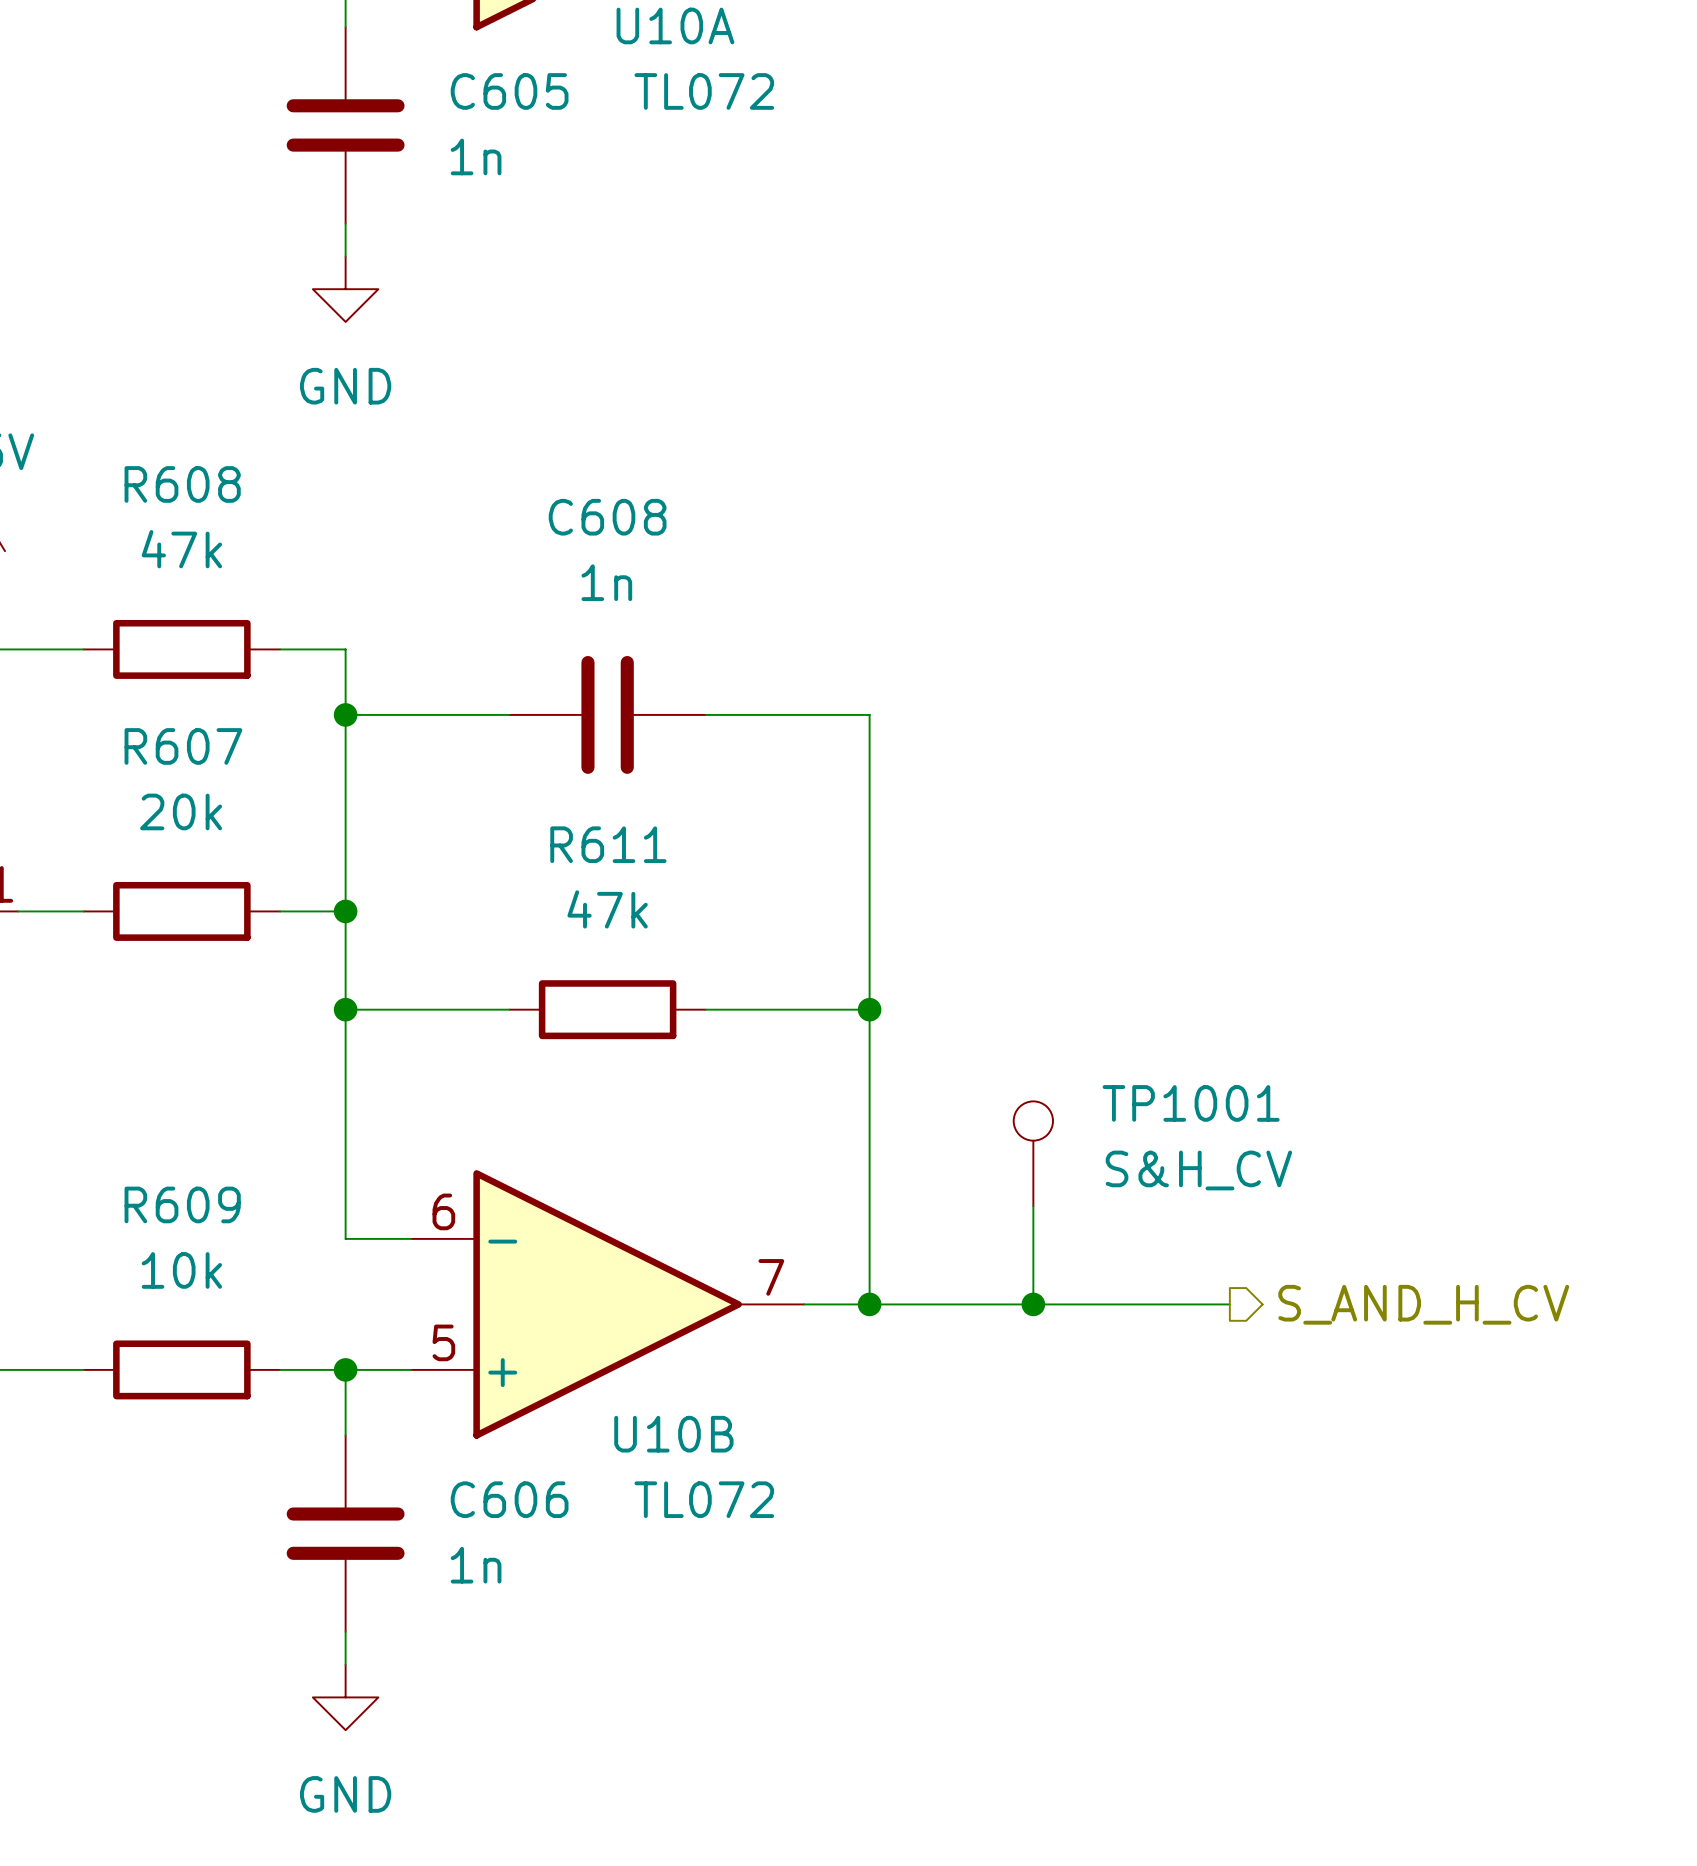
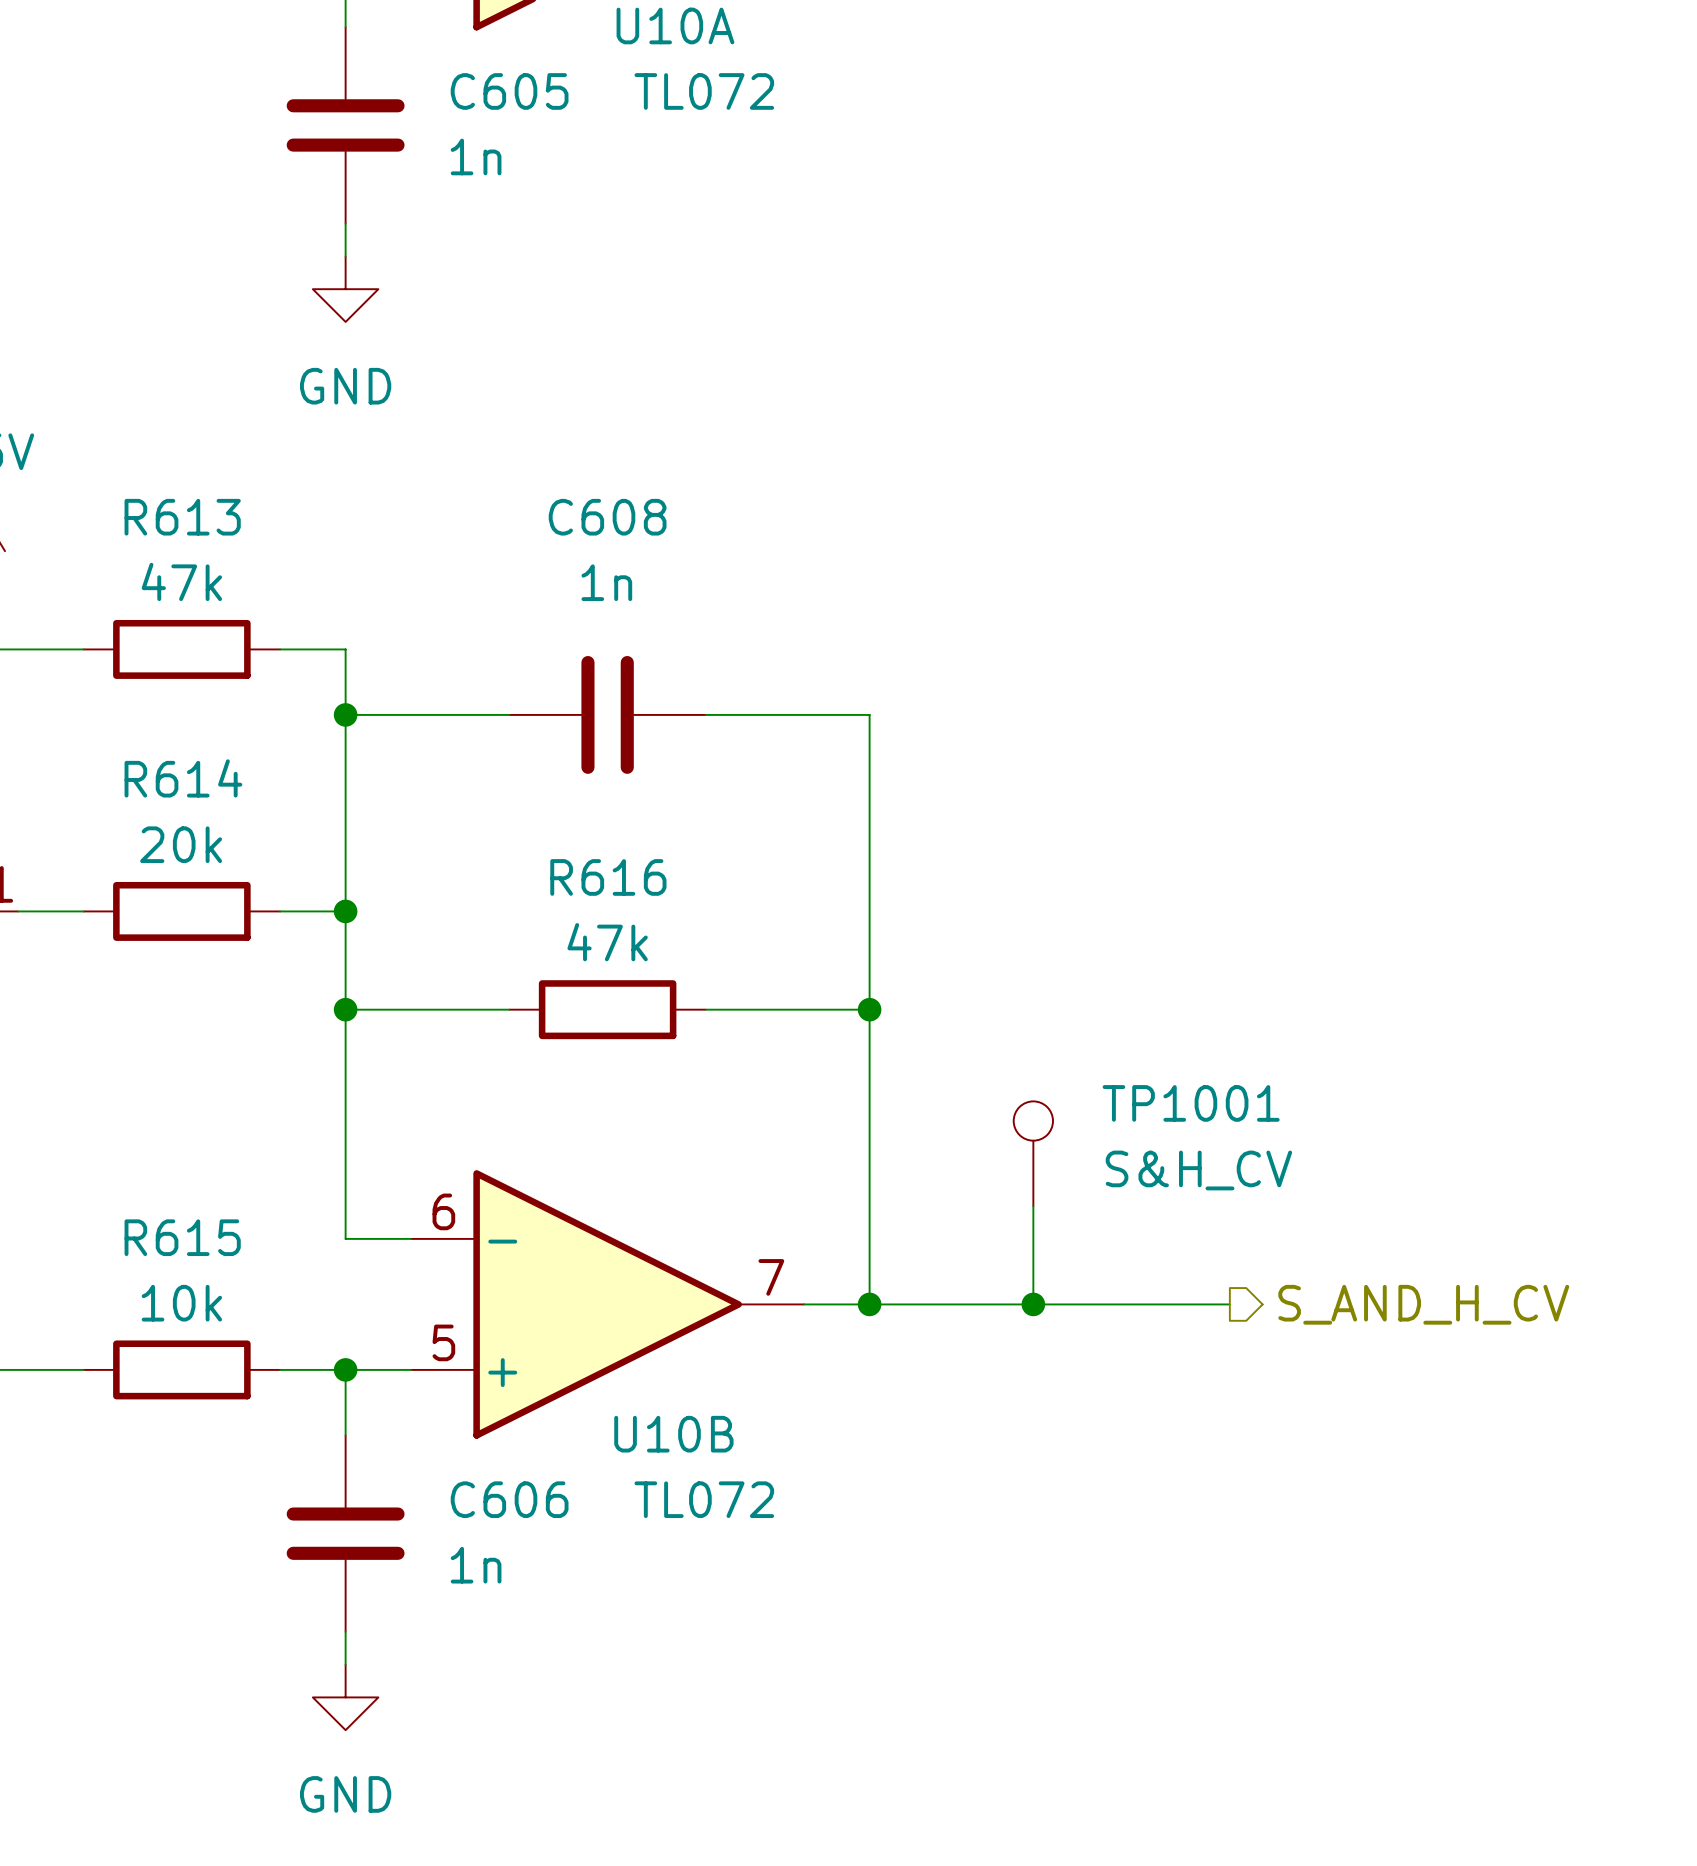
R608 name: R608 (182, 484) -> R613 (182, 517)
R608 value position: 47k (181, 549) -> 47k (181, 581)
R607 name: R607 (183, 746) -> R614 (183, 778)
R607 value position: 20k (181, 811) -> 20k (181, 844)
R611 name: R611 (608, 844) -> R616 (608, 877)
R611 value position: 47k (607, 909) -> 47k (607, 942)
R609 name: R609 (182, 1204) -> R615 (182, 1237)
R609 value position: 10k (181, 1270) -> 10k (181, 1303)

